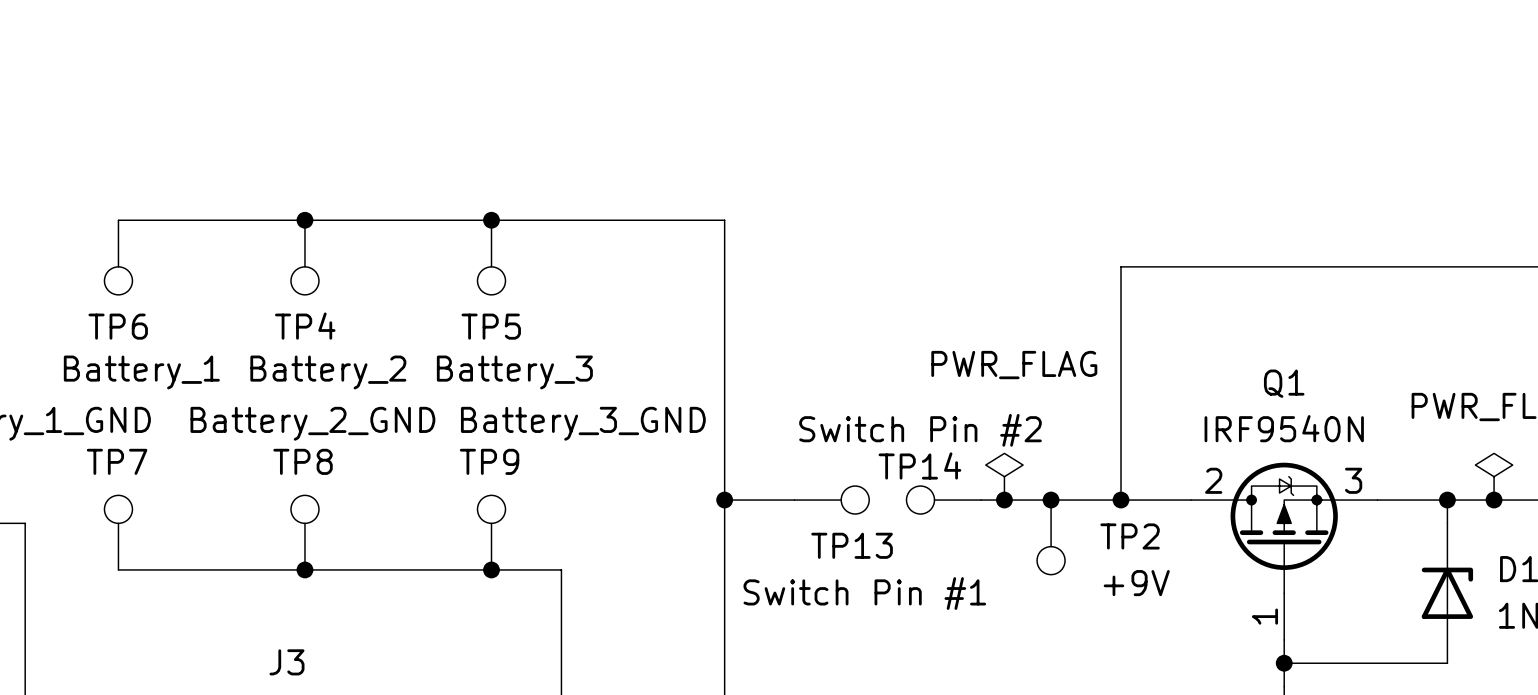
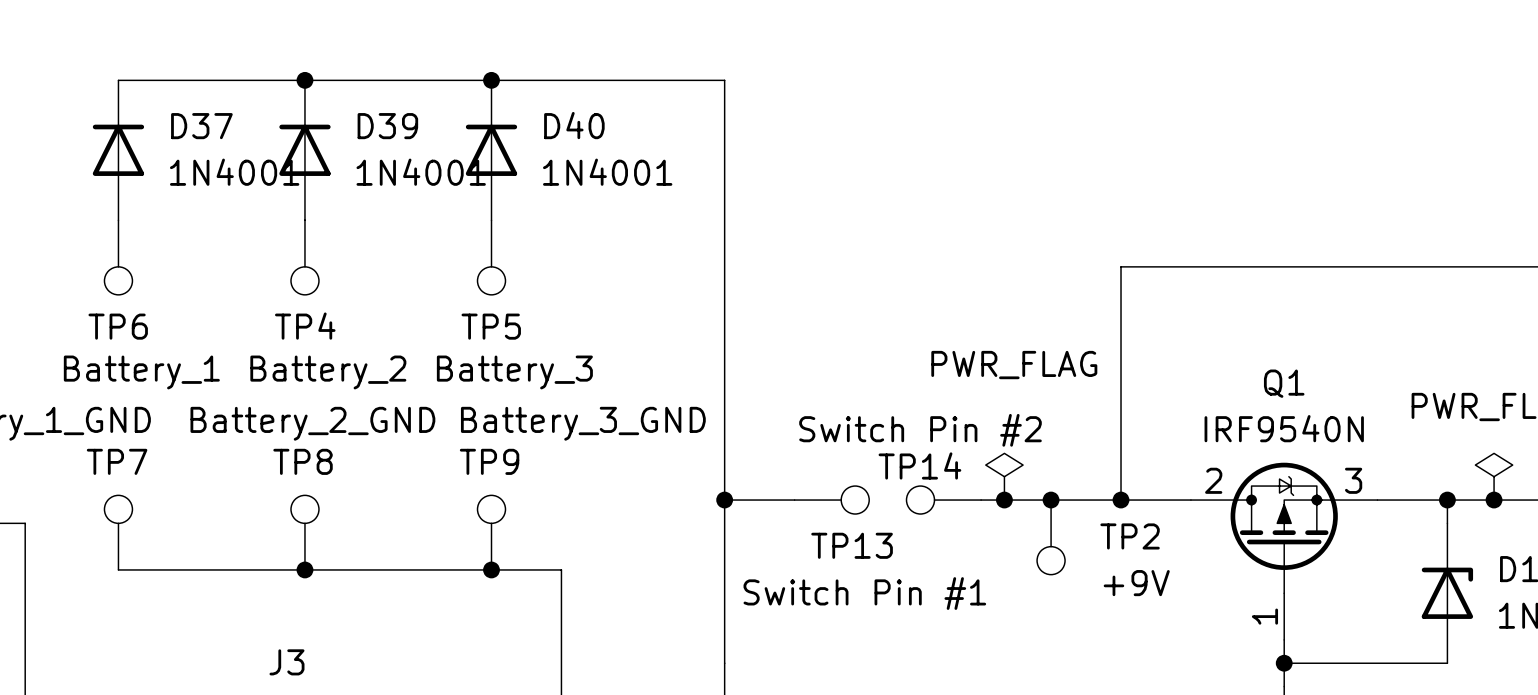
junction: none -> (304, 80)
junction: none -> (491, 80)
D37: none -> 1N4001 (118, 150)
D39: none -> 1N4001 (304, 150)
D40: none -> 1N4001 (491, 150)
wire: (118, 220) (724, 220) -> (118, 80) (724, 80) (724, 220)
junction: (304, 220) -> none
junction: (491, 220) -> none

